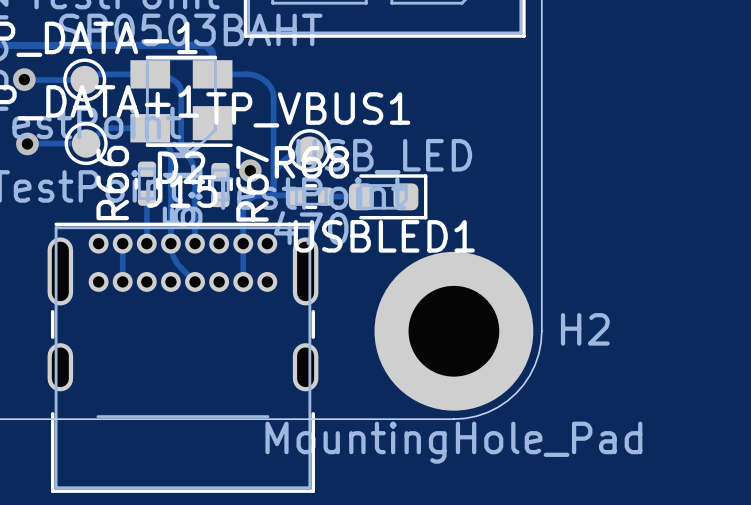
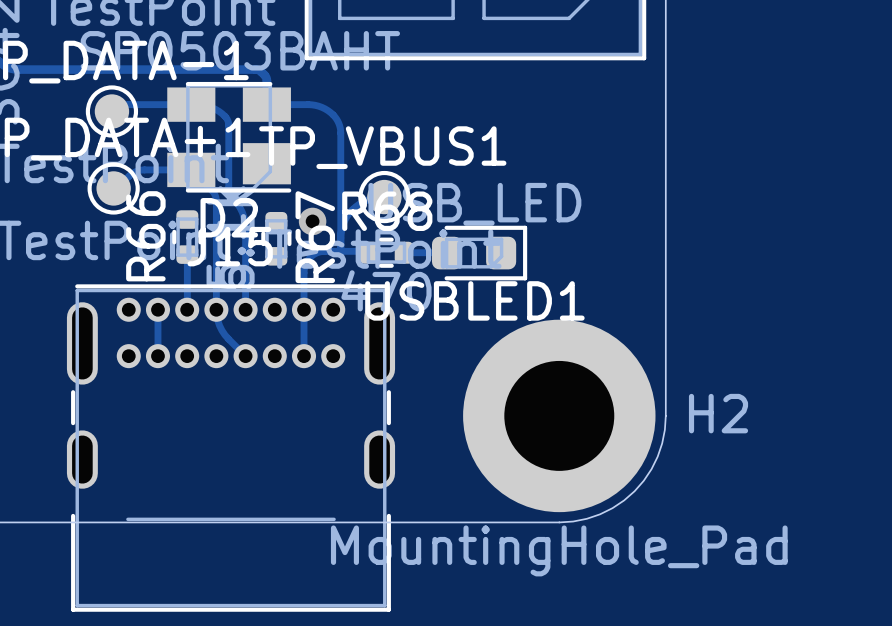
track: (24, 79) (84, 80) -> none
via: (24, 79) -> none
via: (27, 143) -> none
track: (86, 143) (27, 143) -> none

